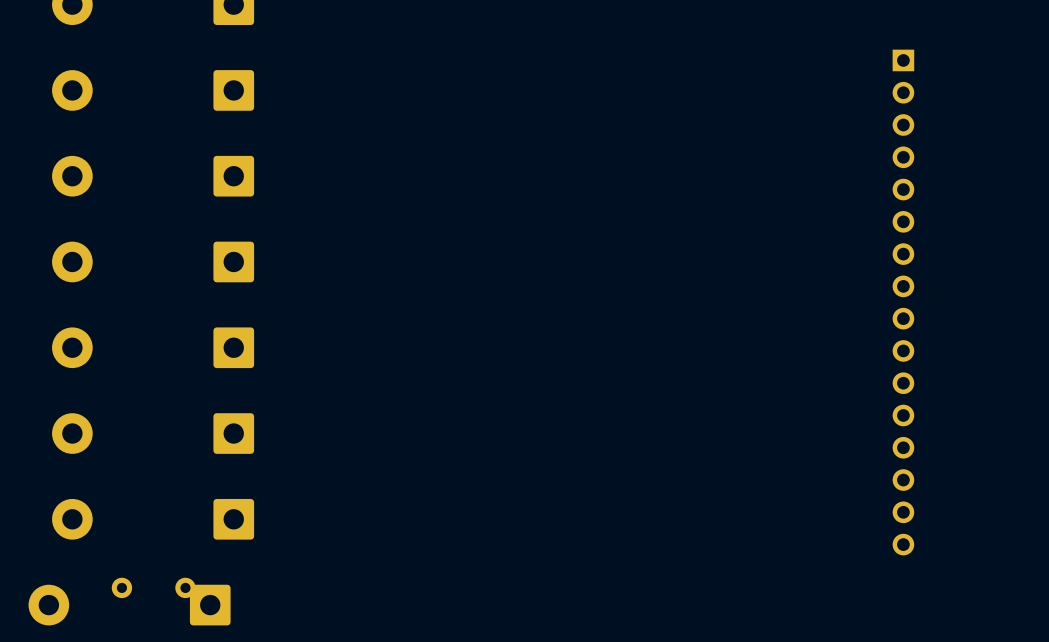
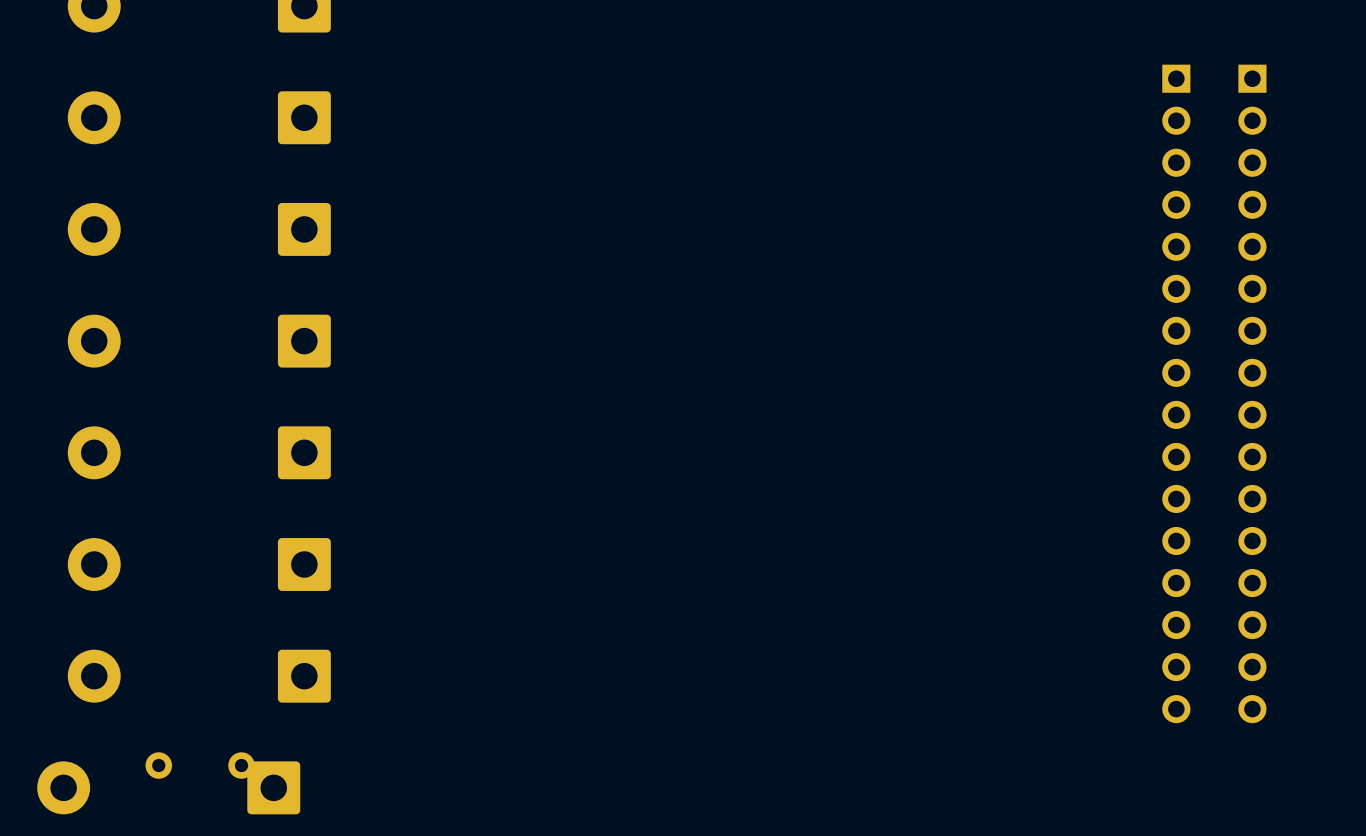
part: none -> (1252, 393)

